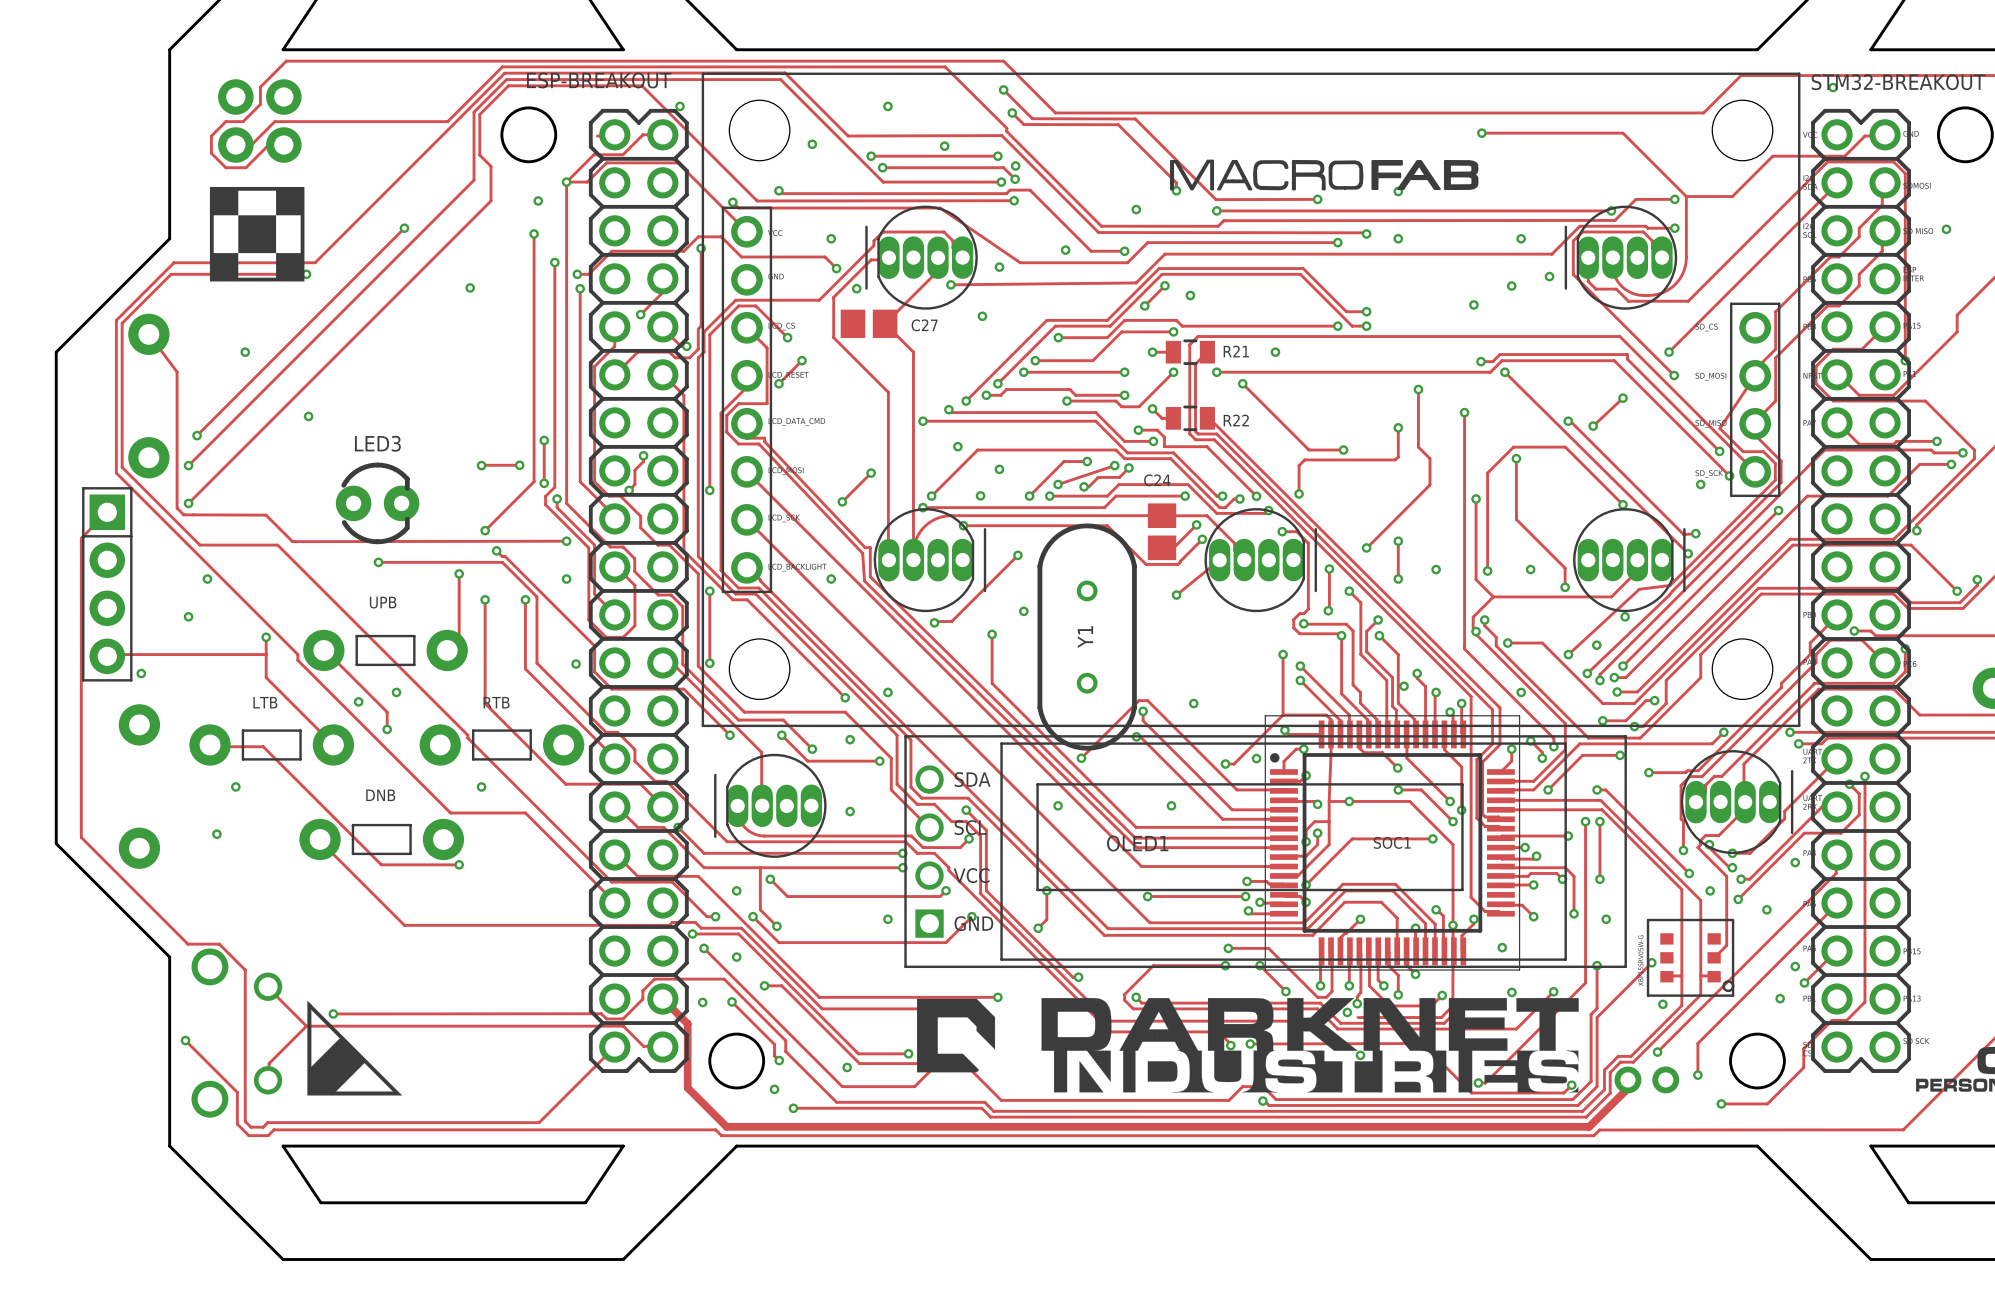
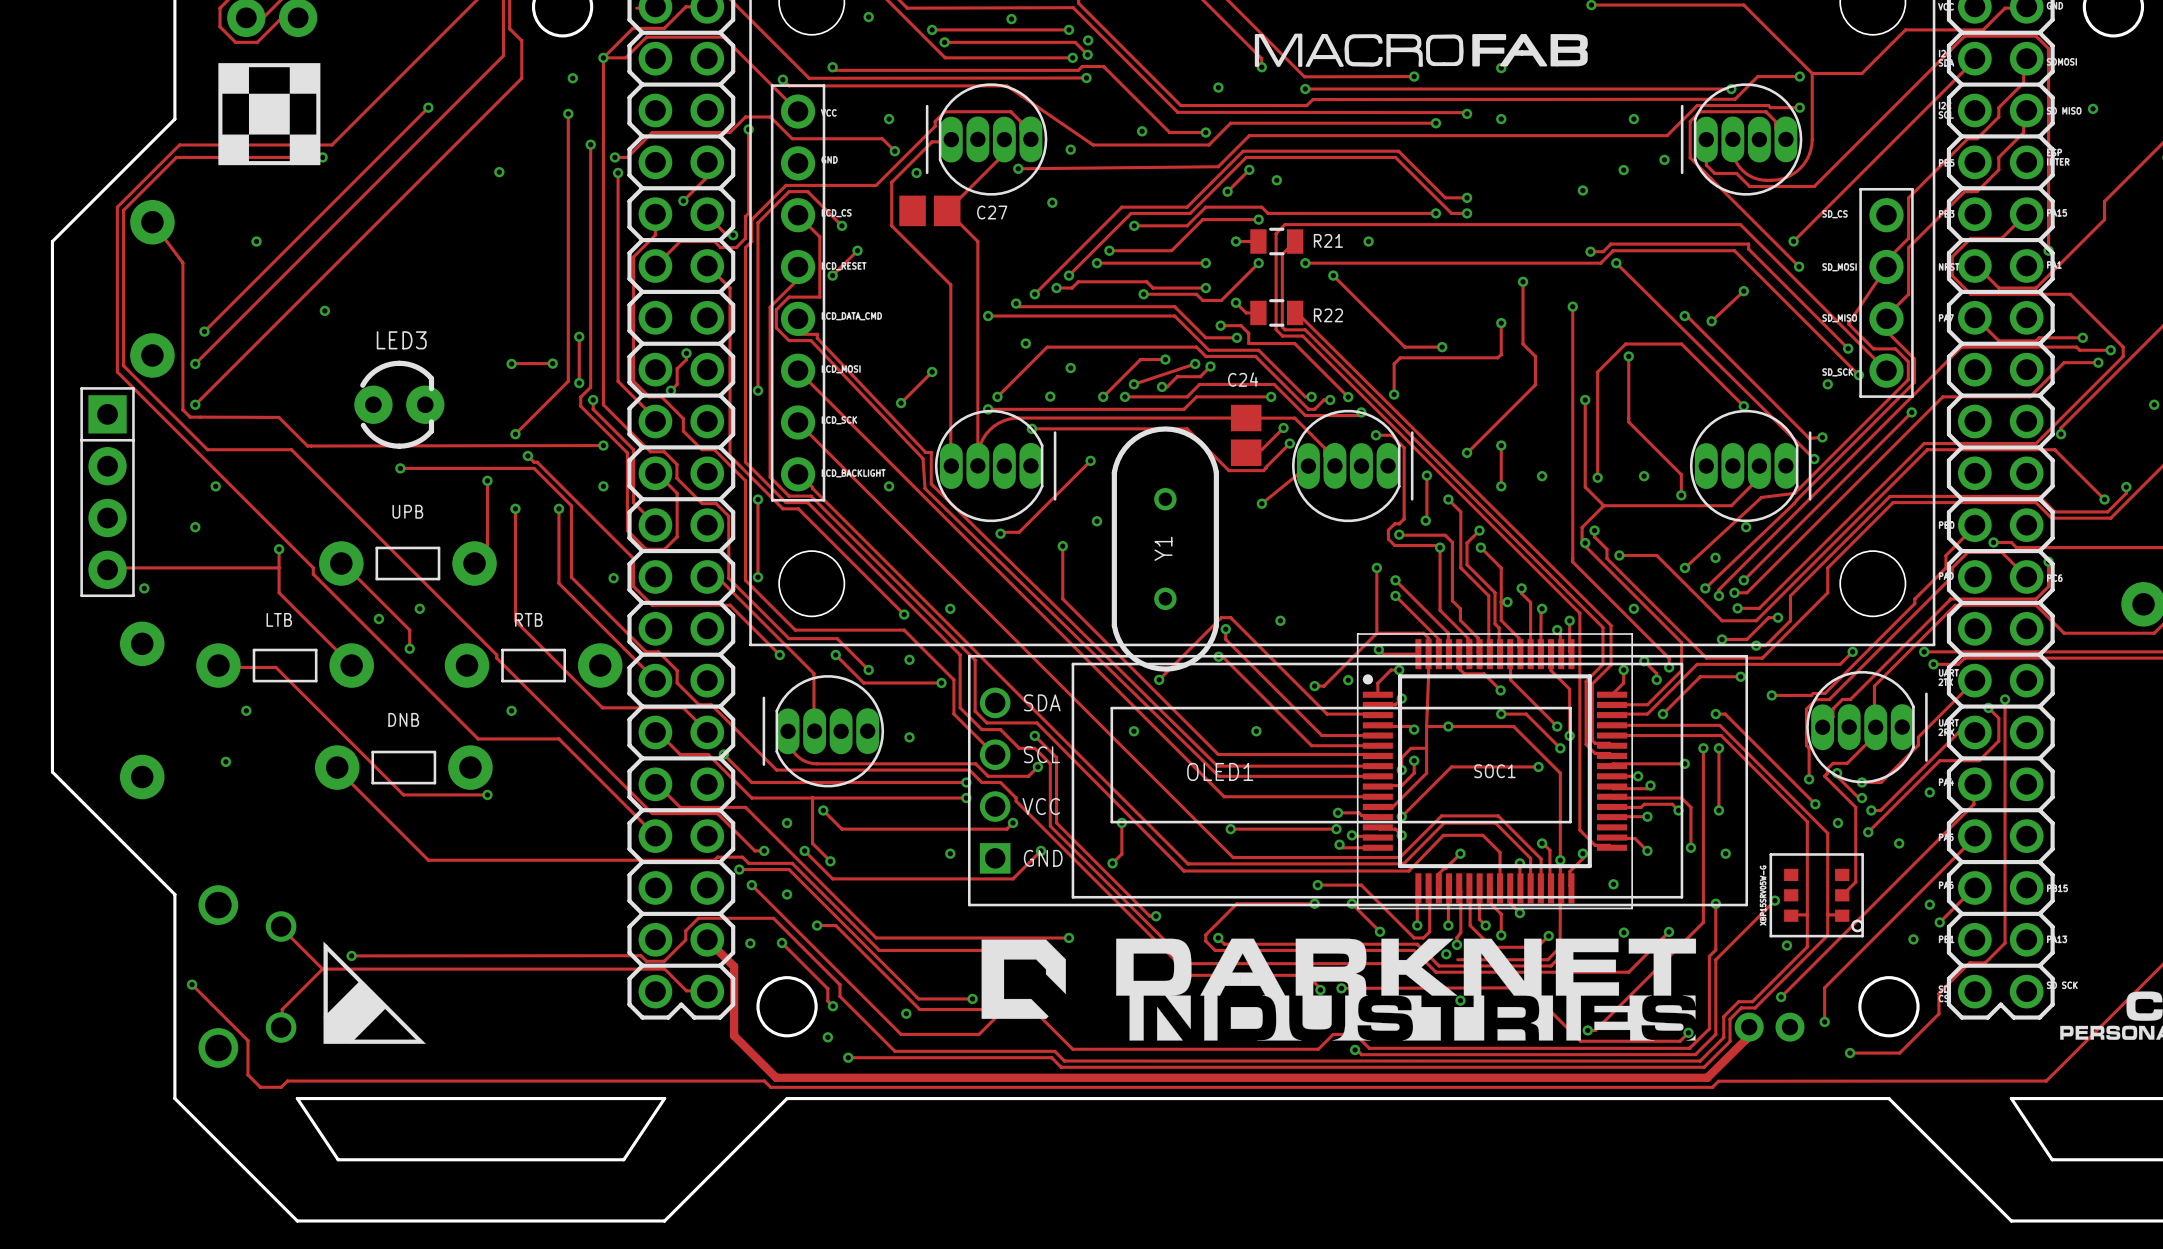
track: (107, 512) (81, 538) (81, 837) (187, 944) (219, 944) (245, 970) (245, 1121) (250, 1127) (263, 1127) (267, 1122) (539, 1122) (614, 1047) -> none

